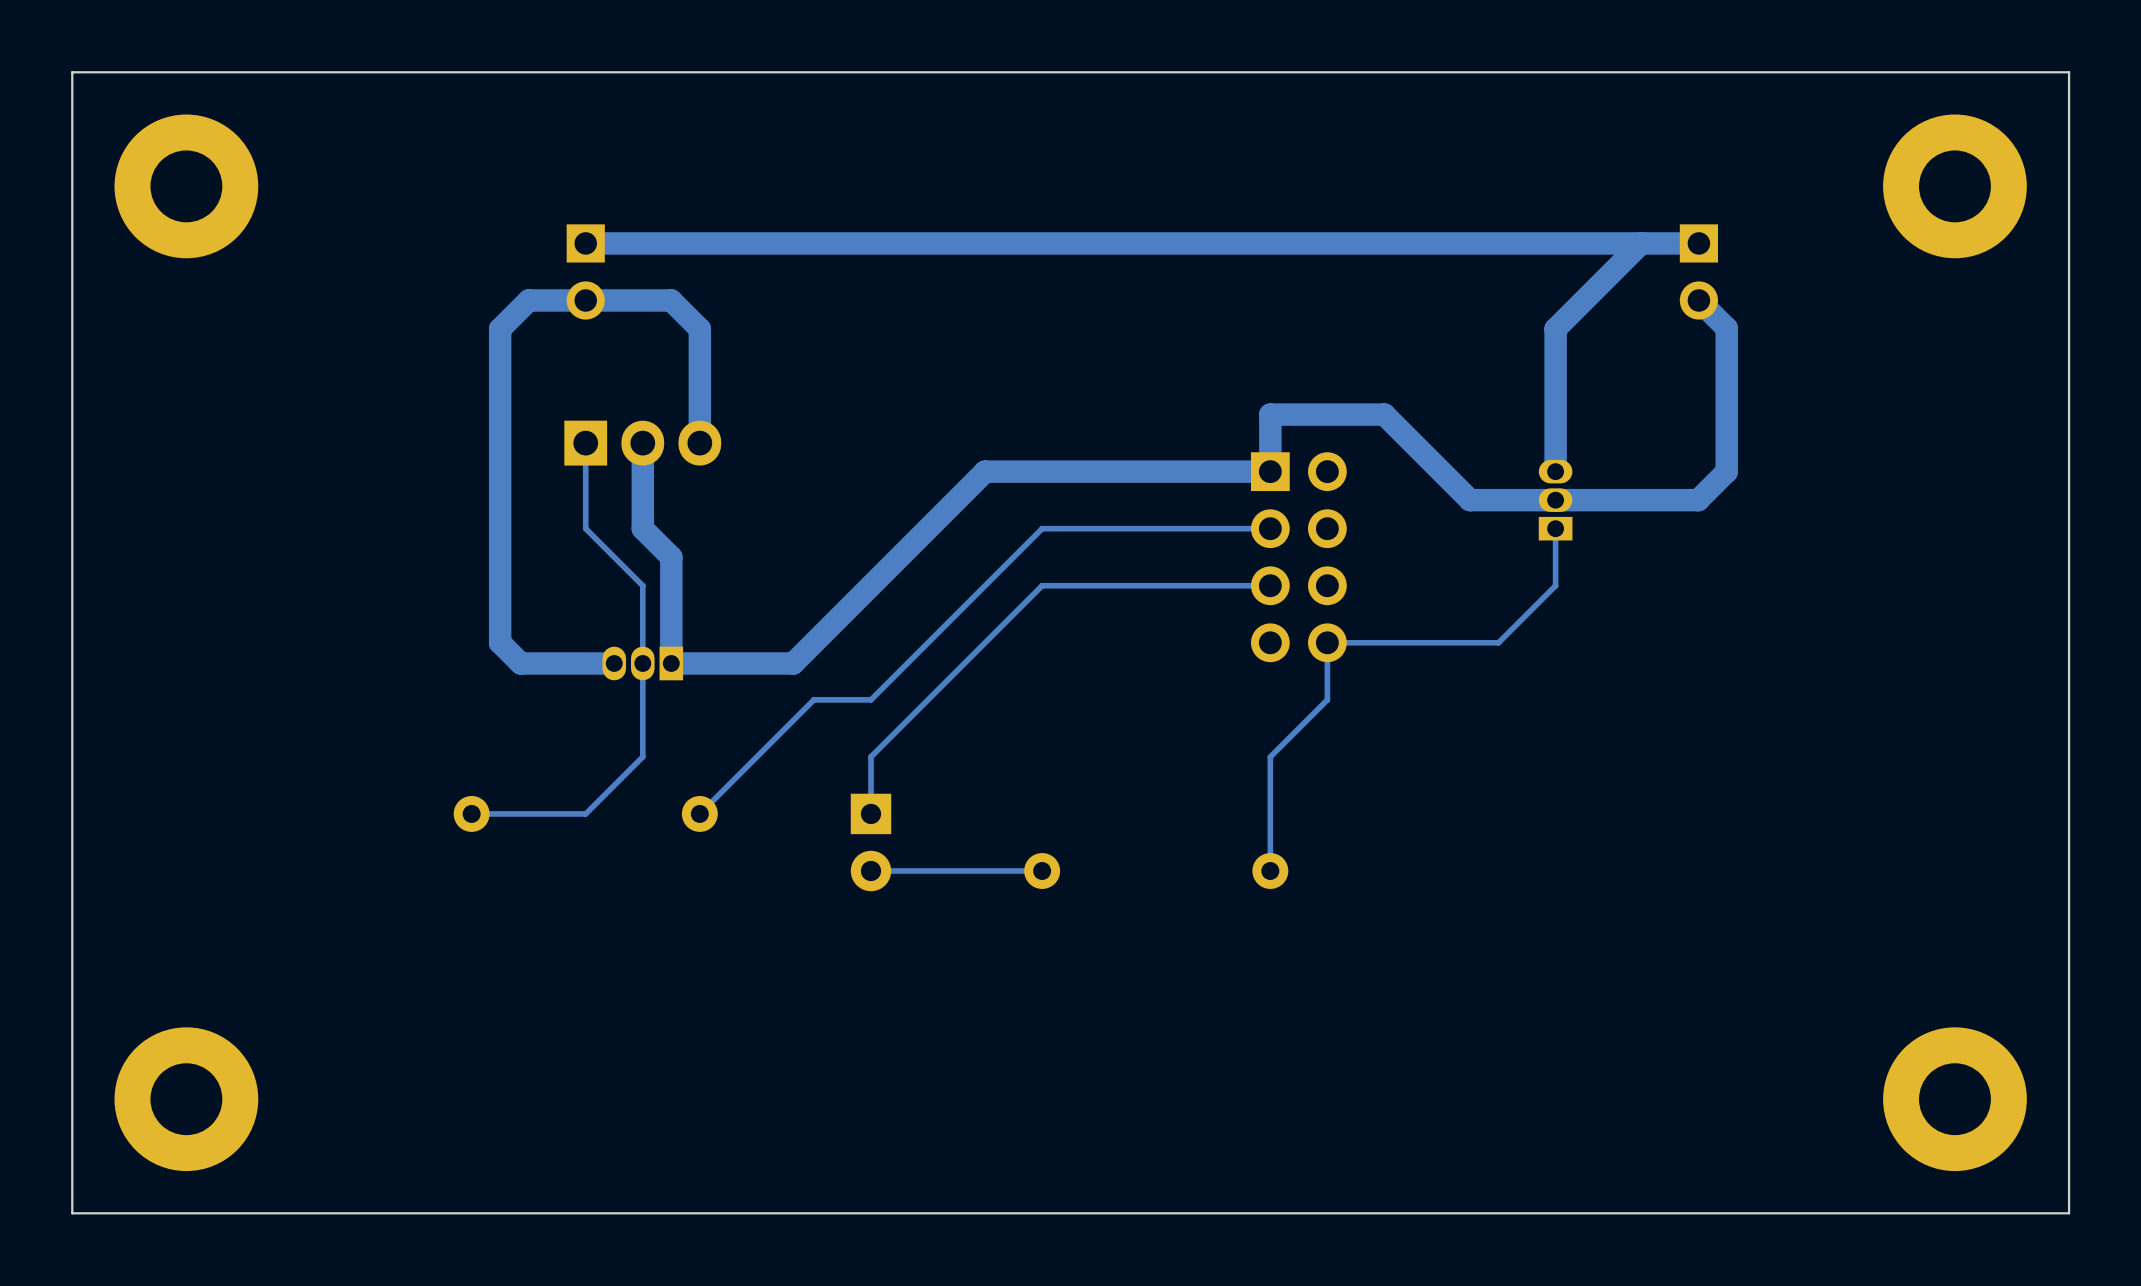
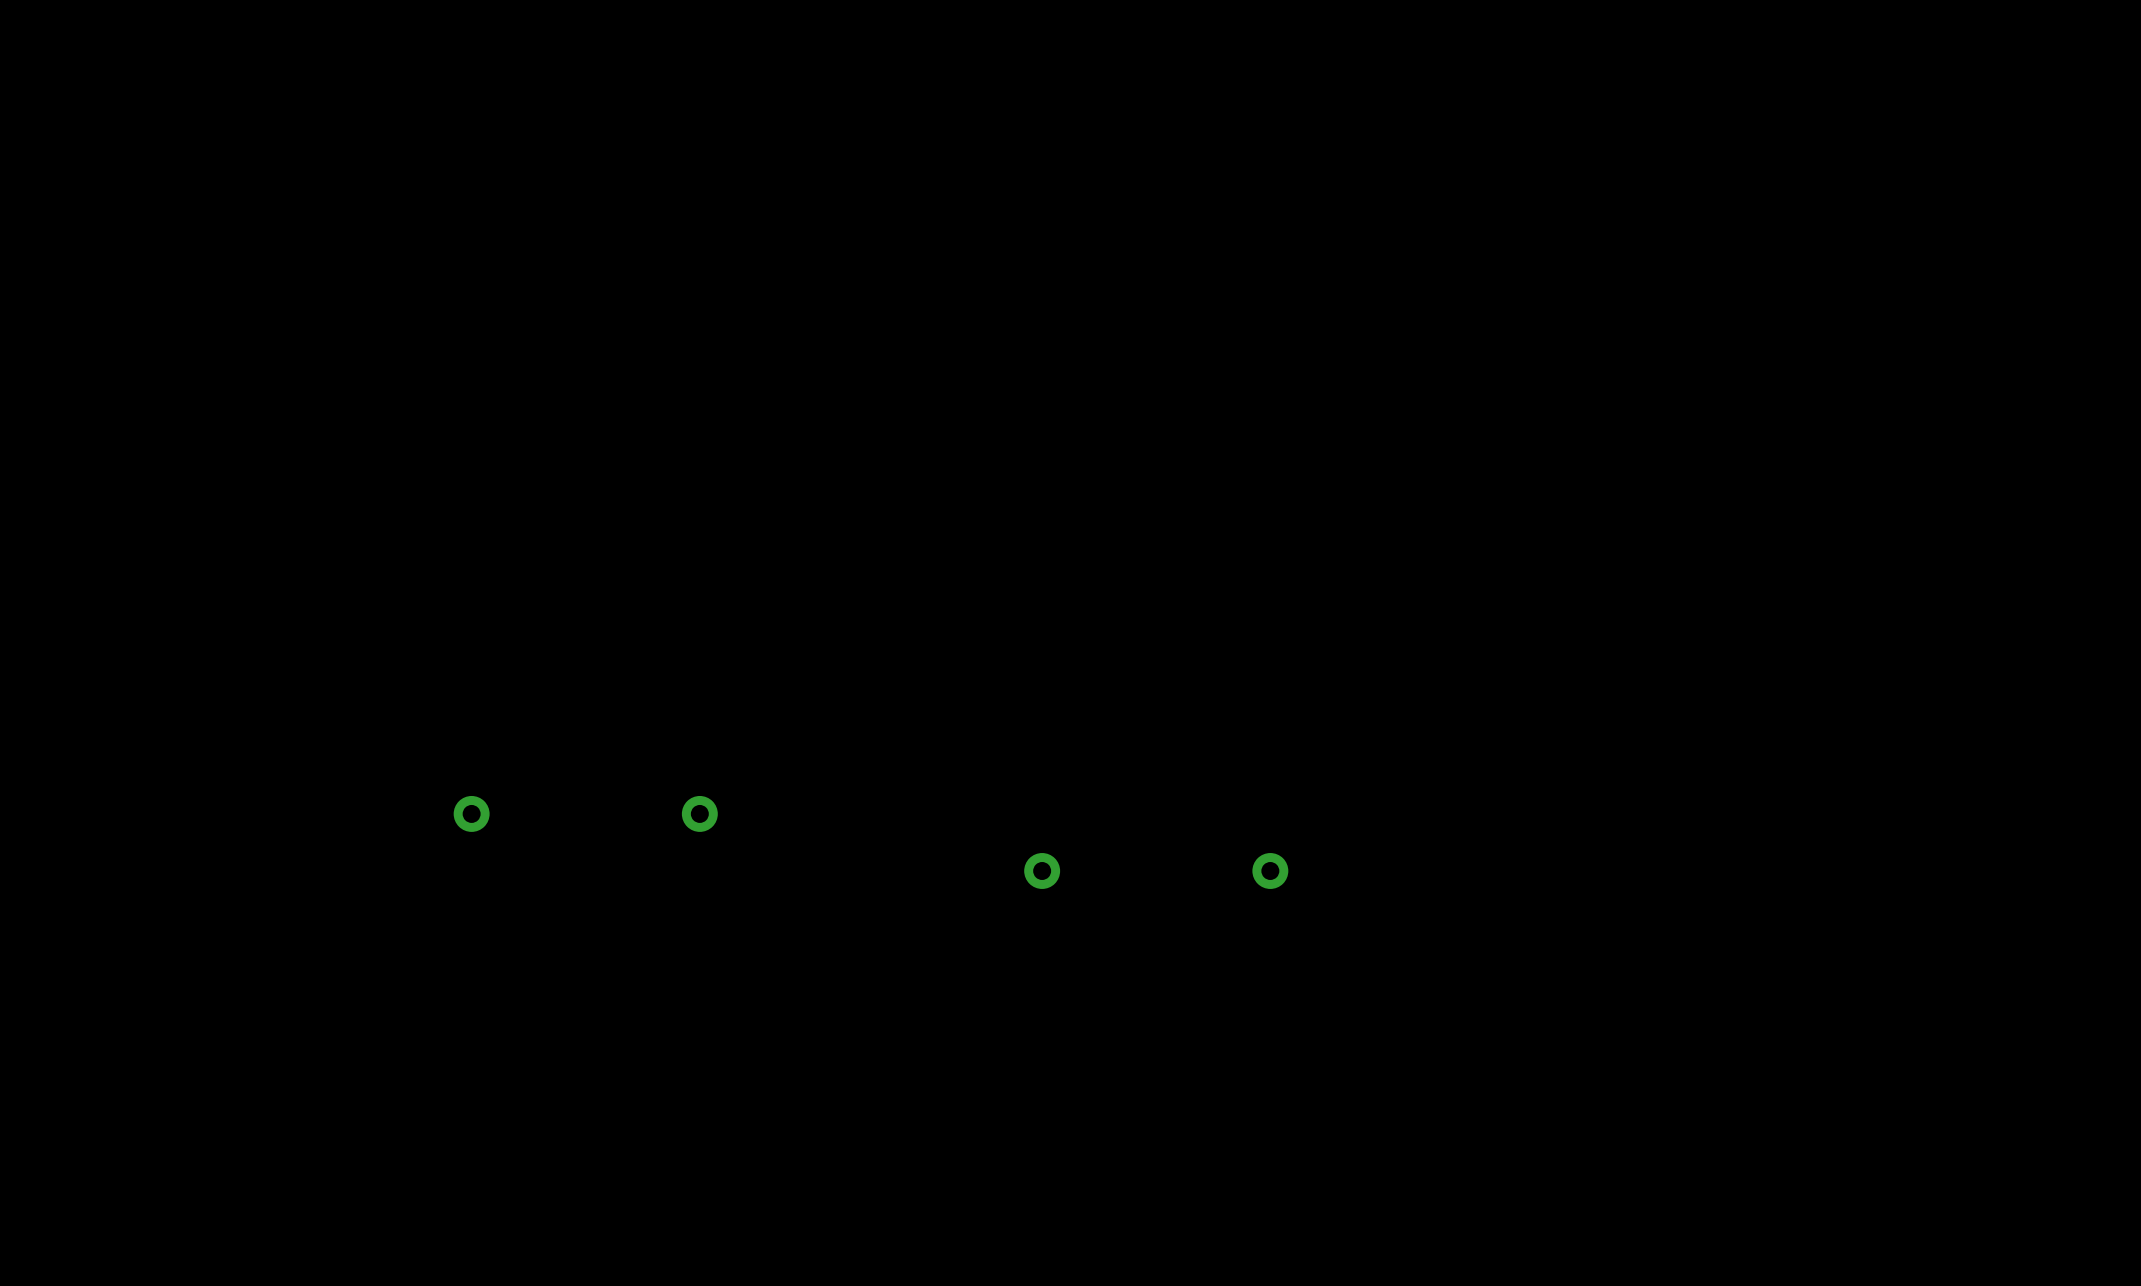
board edge: (2069, 72) (72, 72) (72, 1213) (2069, 1213) (2069, 72) -> none
part: (186, 186) -> none
part: (1954, 186) -> none
track: (1641, 243) (1555, 329) (1555, 471) -> none
track: (1698, 243) (585, 243) -> none
part: (585, 271) -> none
part: (1698, 271) -> none
track: (1698, 300) (1726, 328) (1726, 471) (1698, 500) (1470, 500) (1384, 414) (1270, 414) (1270, 471) (985, 471) (793, 663) (671, 663) (671, 557) (642, 528) (642, 443) -> none
track: (585, 443) (585, 528) (642, 585) (642, 756) (585, 813) (471, 813) -> none
part: (642, 443) -> none
track: (699, 443) (699, 329) (671, 300) (528, 300) (500, 329) (500, 642) (520, 663) (614, 663) -> none
part: (1555, 500) -> none
track: (1270, 528) (1042, 528) (870, 699) (813, 699) (699, 813) -> none
track: (1555, 528) (1555, 585) (1498, 642) (1327, 642) (1327, 699) (1270, 756) (1270, 870) -> none
part: (1298, 557) -> none
track: (1270, 585) (1042, 585) (870, 756) (870, 813) -> none
part: (642, 663) -> none
part: (870, 842) -> none
track: (1042, 870) (870, 870) -> none
part: (186, 1099) -> none
part: (1954, 1099) -> none

